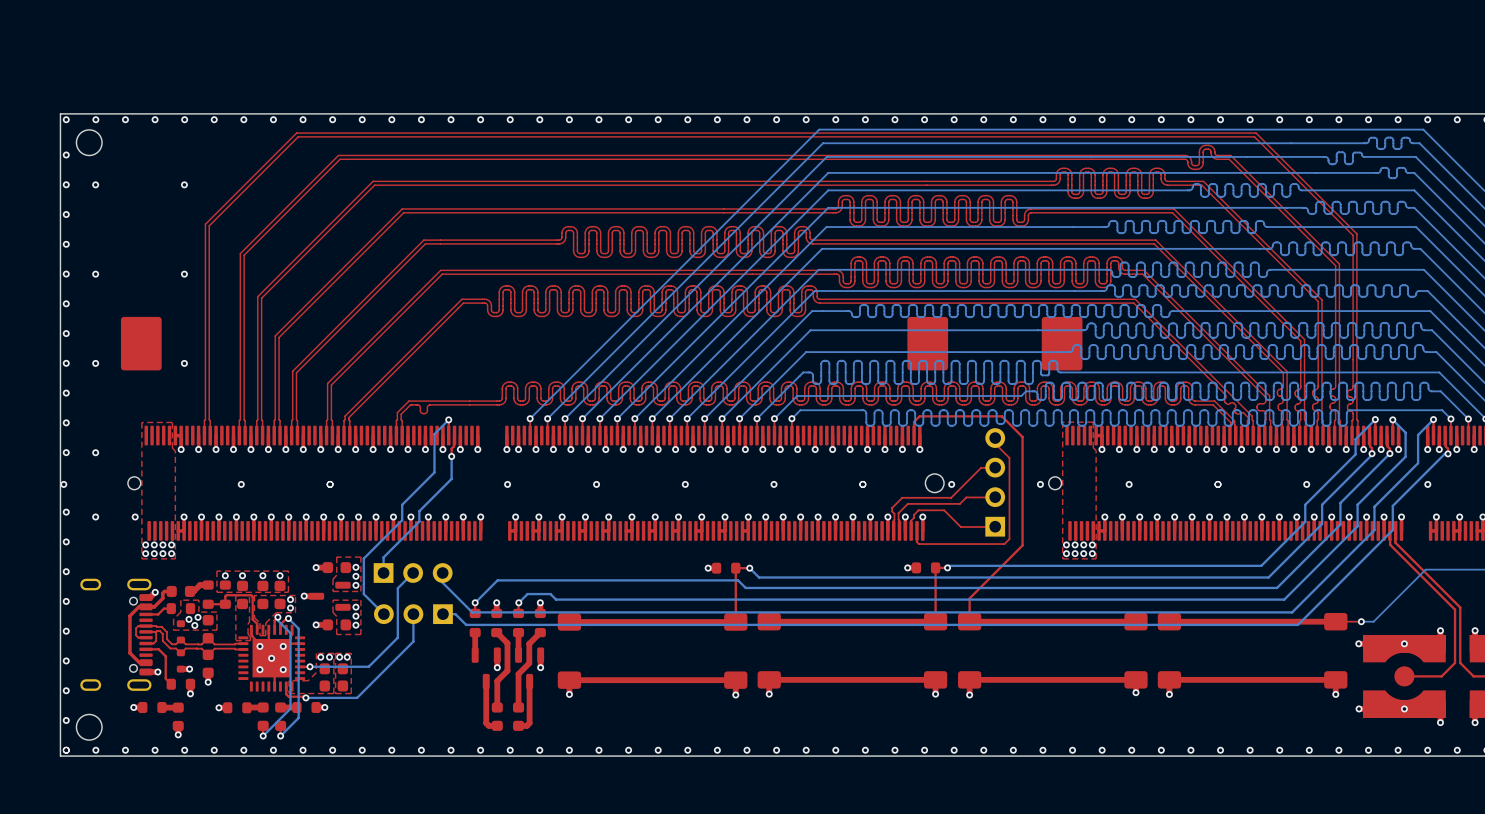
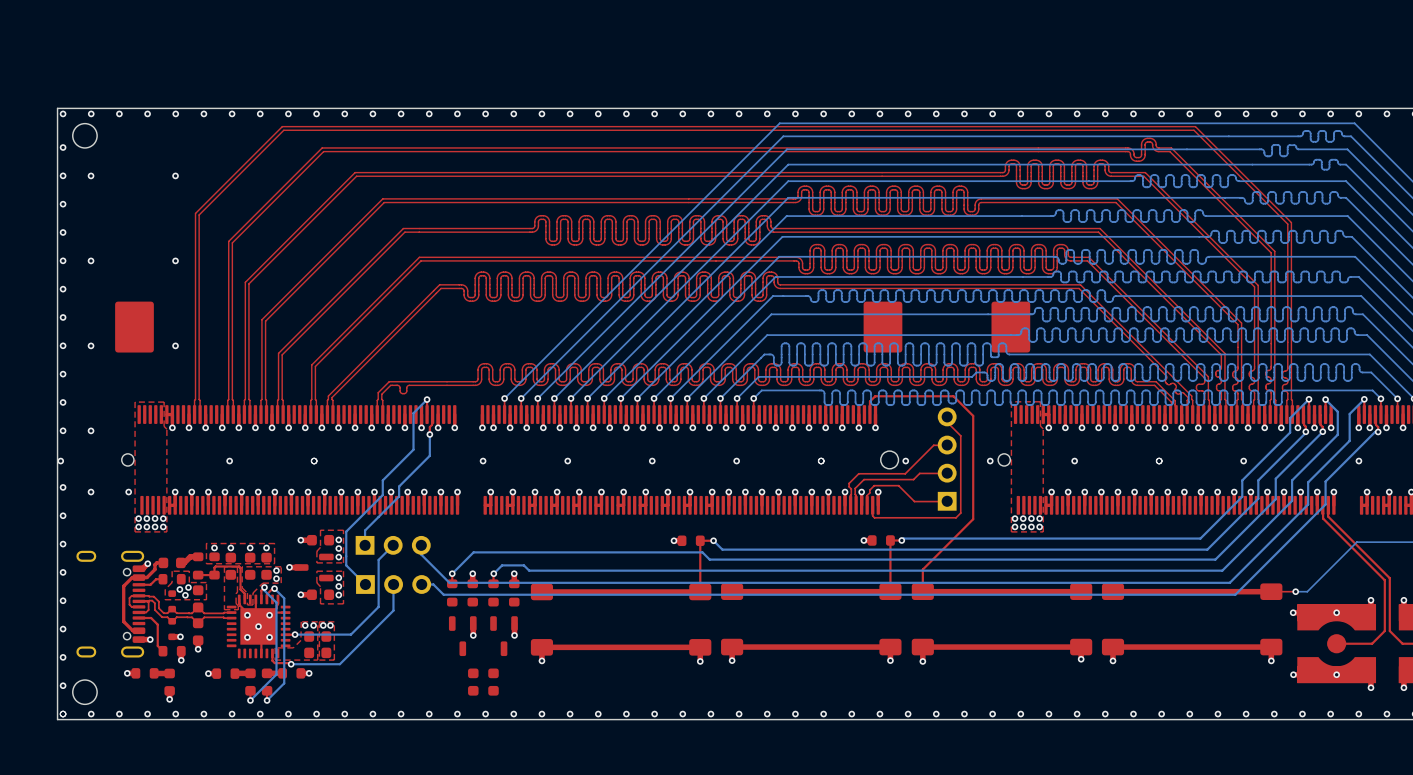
part rotation: 0° (413, 614) -> 180° (393, 584)
top track: (475, 632) (475, 655) -> none
top track: (496, 632) (507, 643) (507, 670) (497, 681) (497, 707) -> none
top track: (518, 632) (518, 655) -> none
top track: (540, 632) (529, 643) (529, 663) (518, 674) (518, 707) -> none
top track: (486, 681) (486, 723) (488, 725) (497, 725) -> none
top track: (529, 681) (529, 723) (526, 725) (518, 725) -> none

